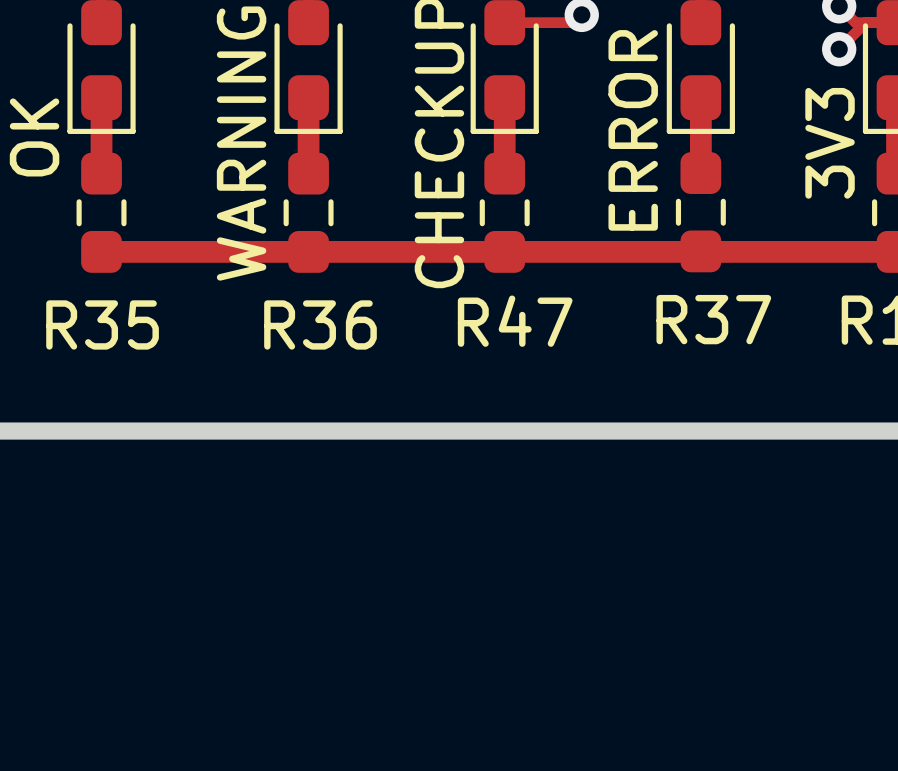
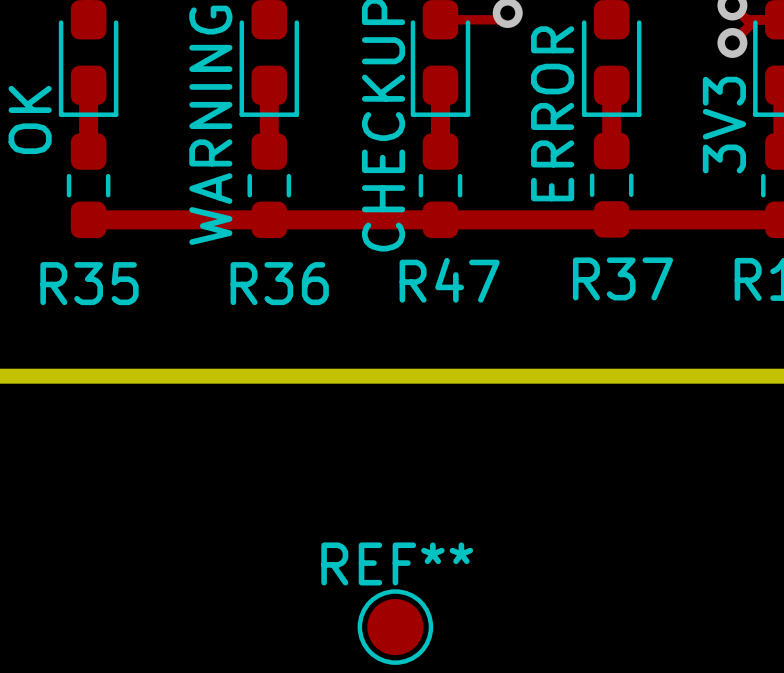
REF**: none -> (395, 627)

